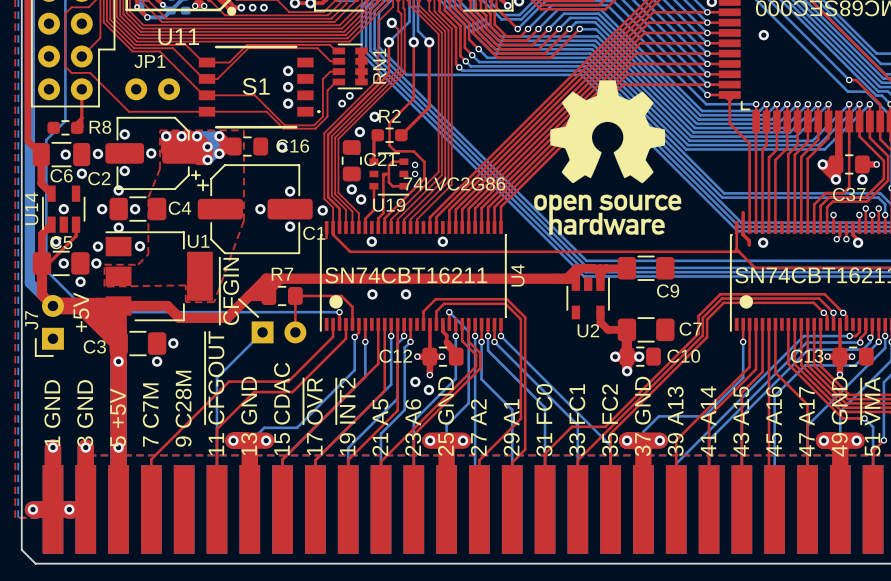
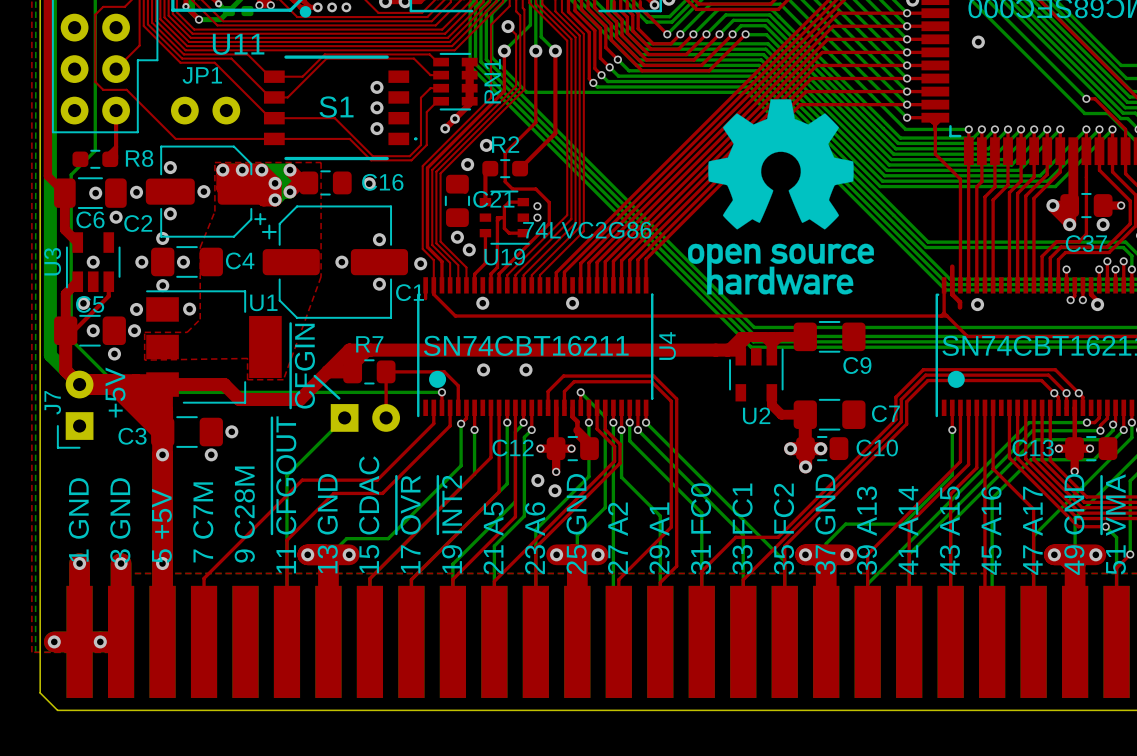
top track: none -> (469, 101) (469, 104) (445, 128)
U14 name: U14 (31, 208) -> U3 (52, 261)

